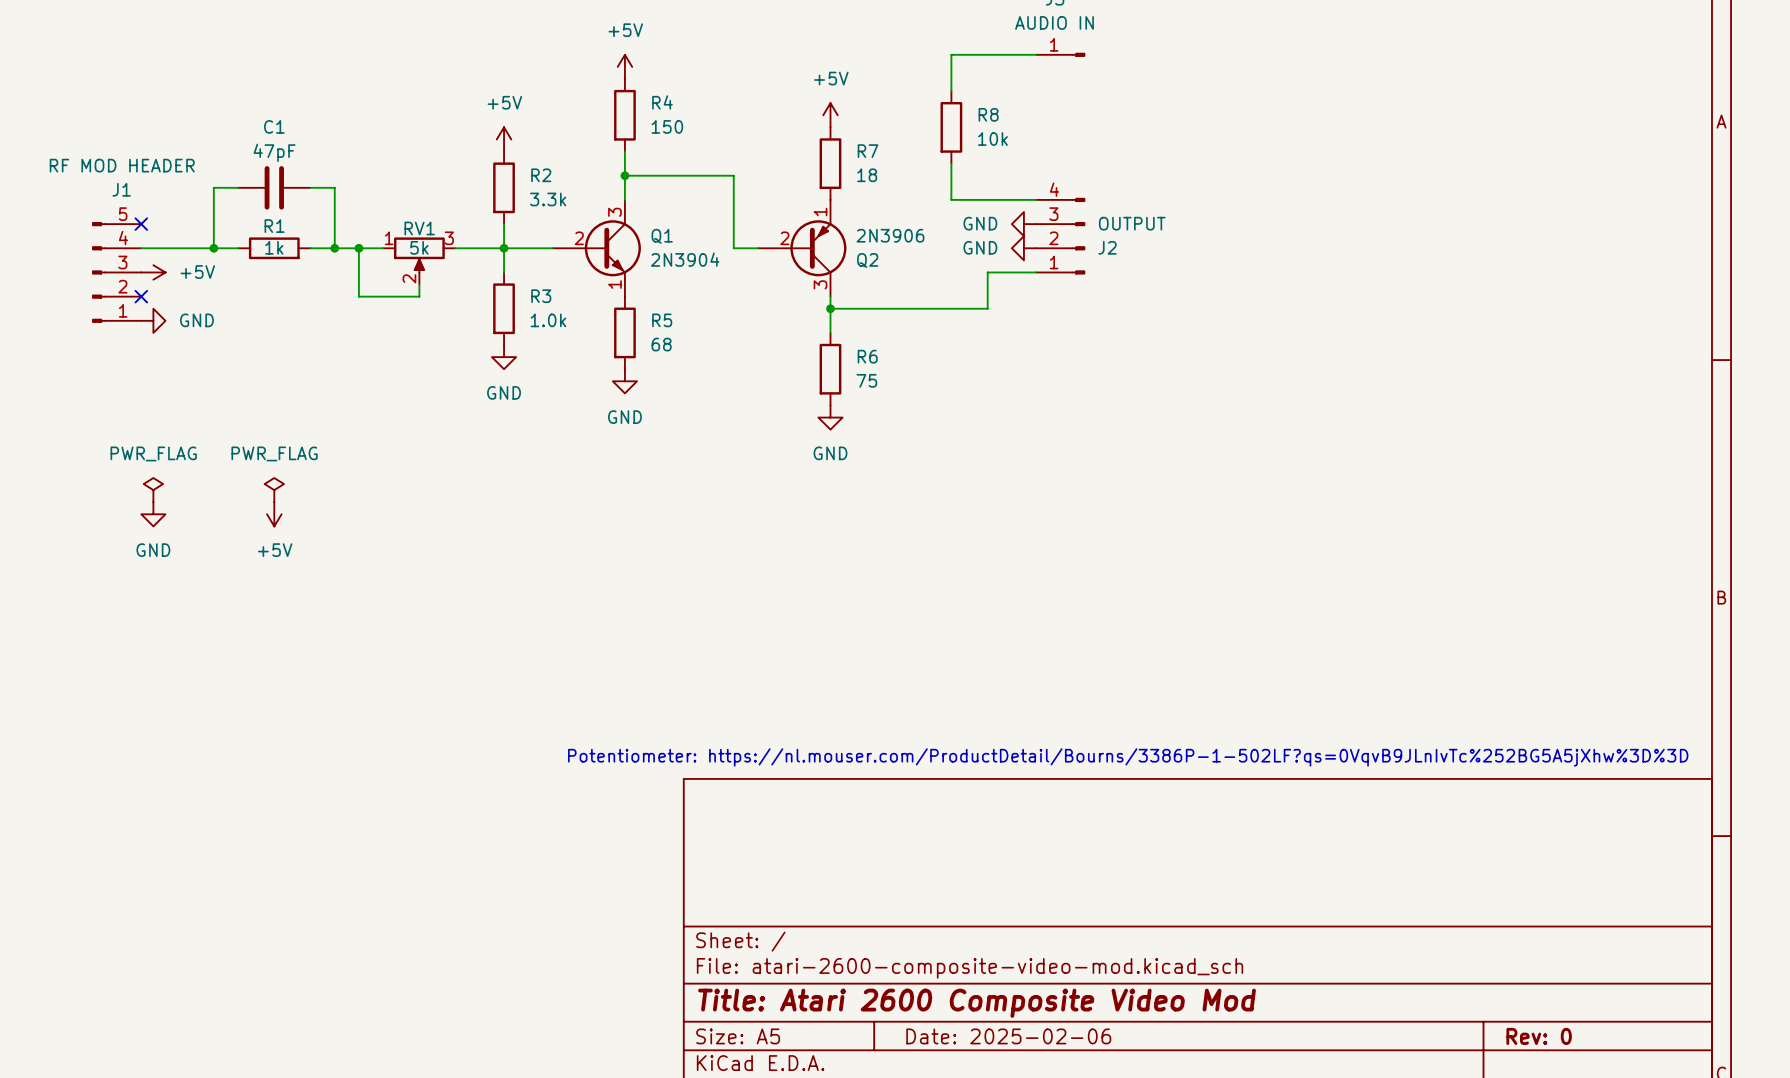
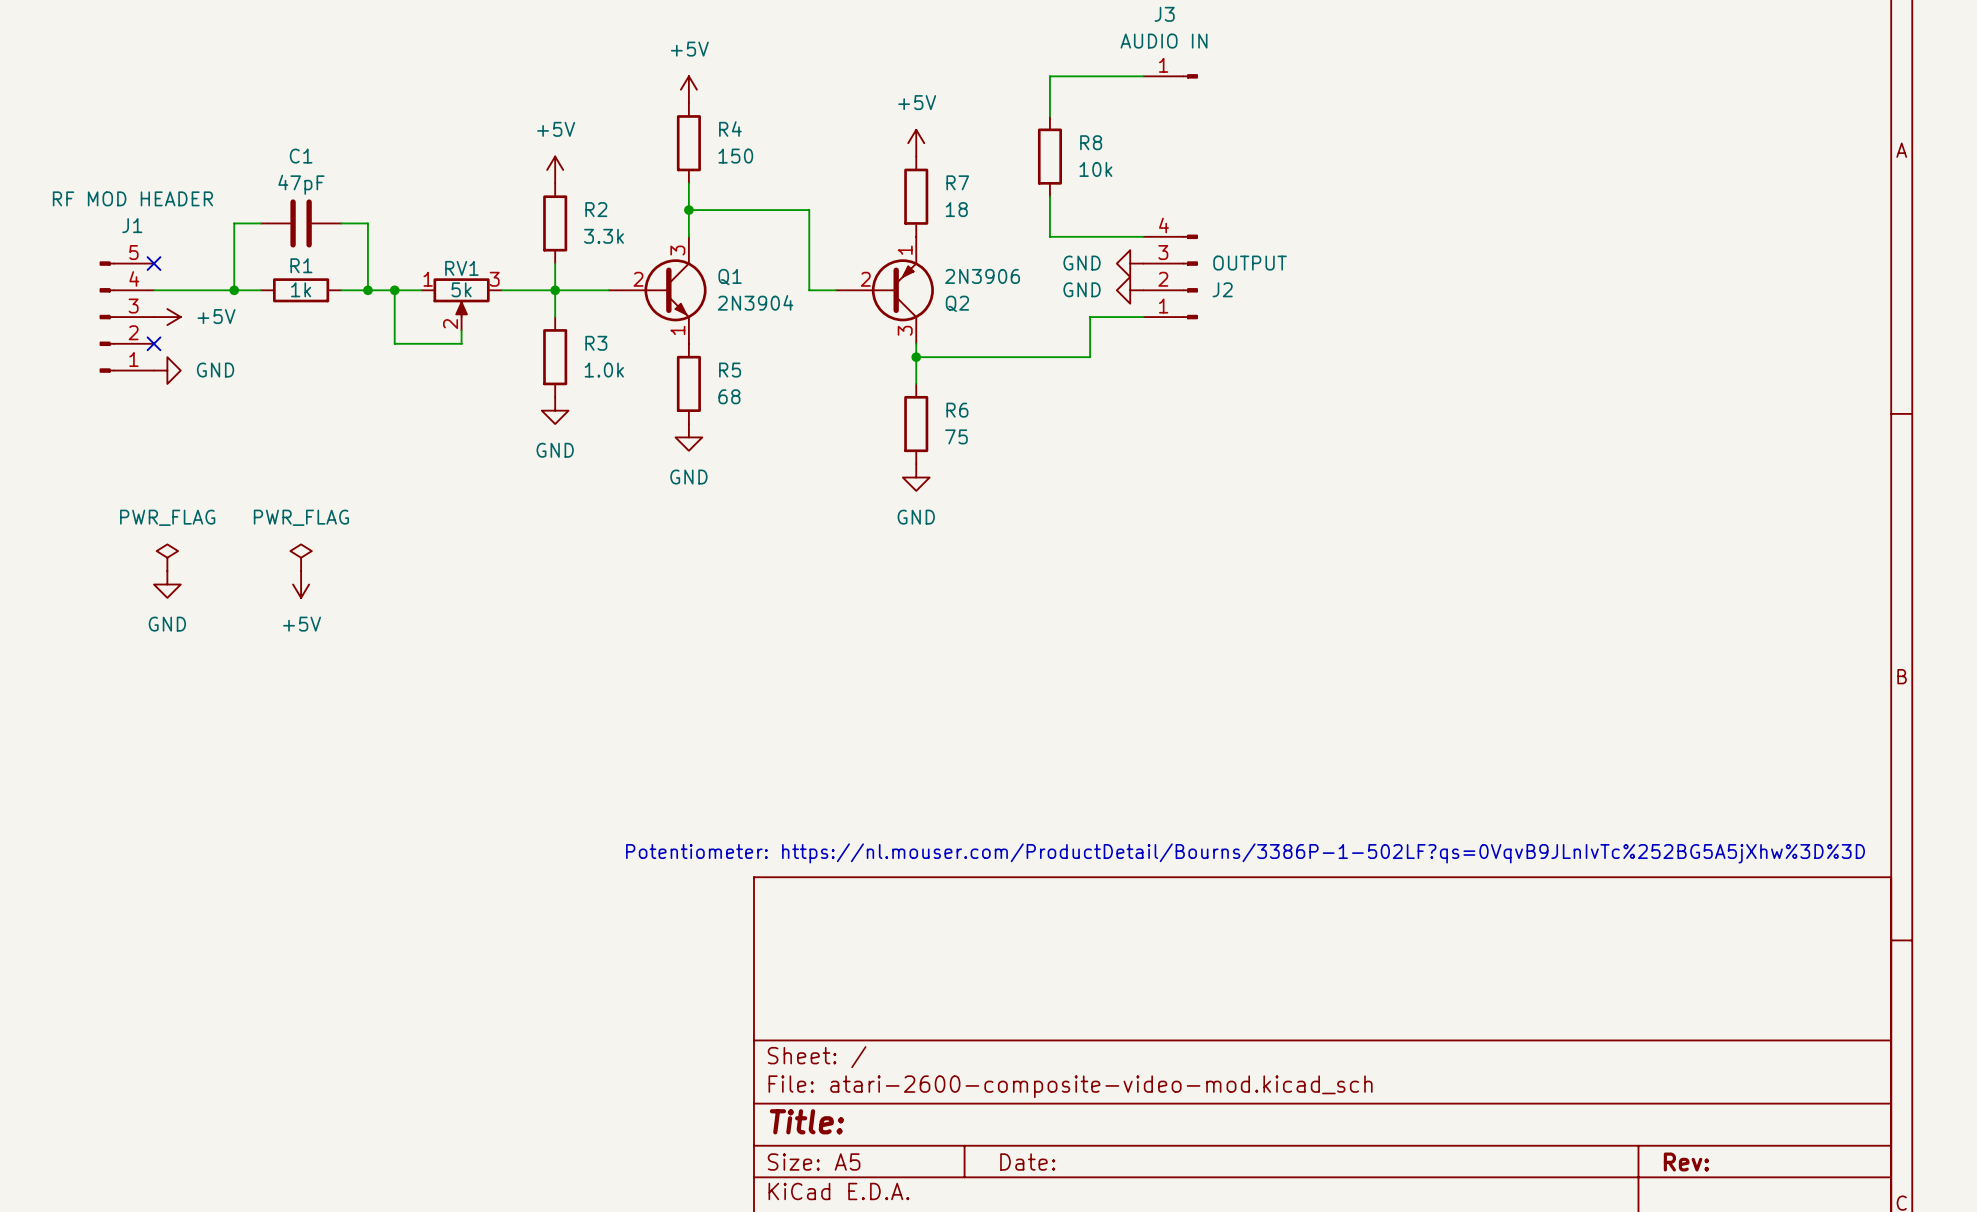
title block: Title: Atari 2600 Composite Video Mod (977, 1003) -> Title: (806, 1121)
title block: Date: 2025-02-06 (1008, 1036) -> Date: (1027, 1162)
title block: Rev: 0 (1539, 1036) -> Rev: (1686, 1162)

